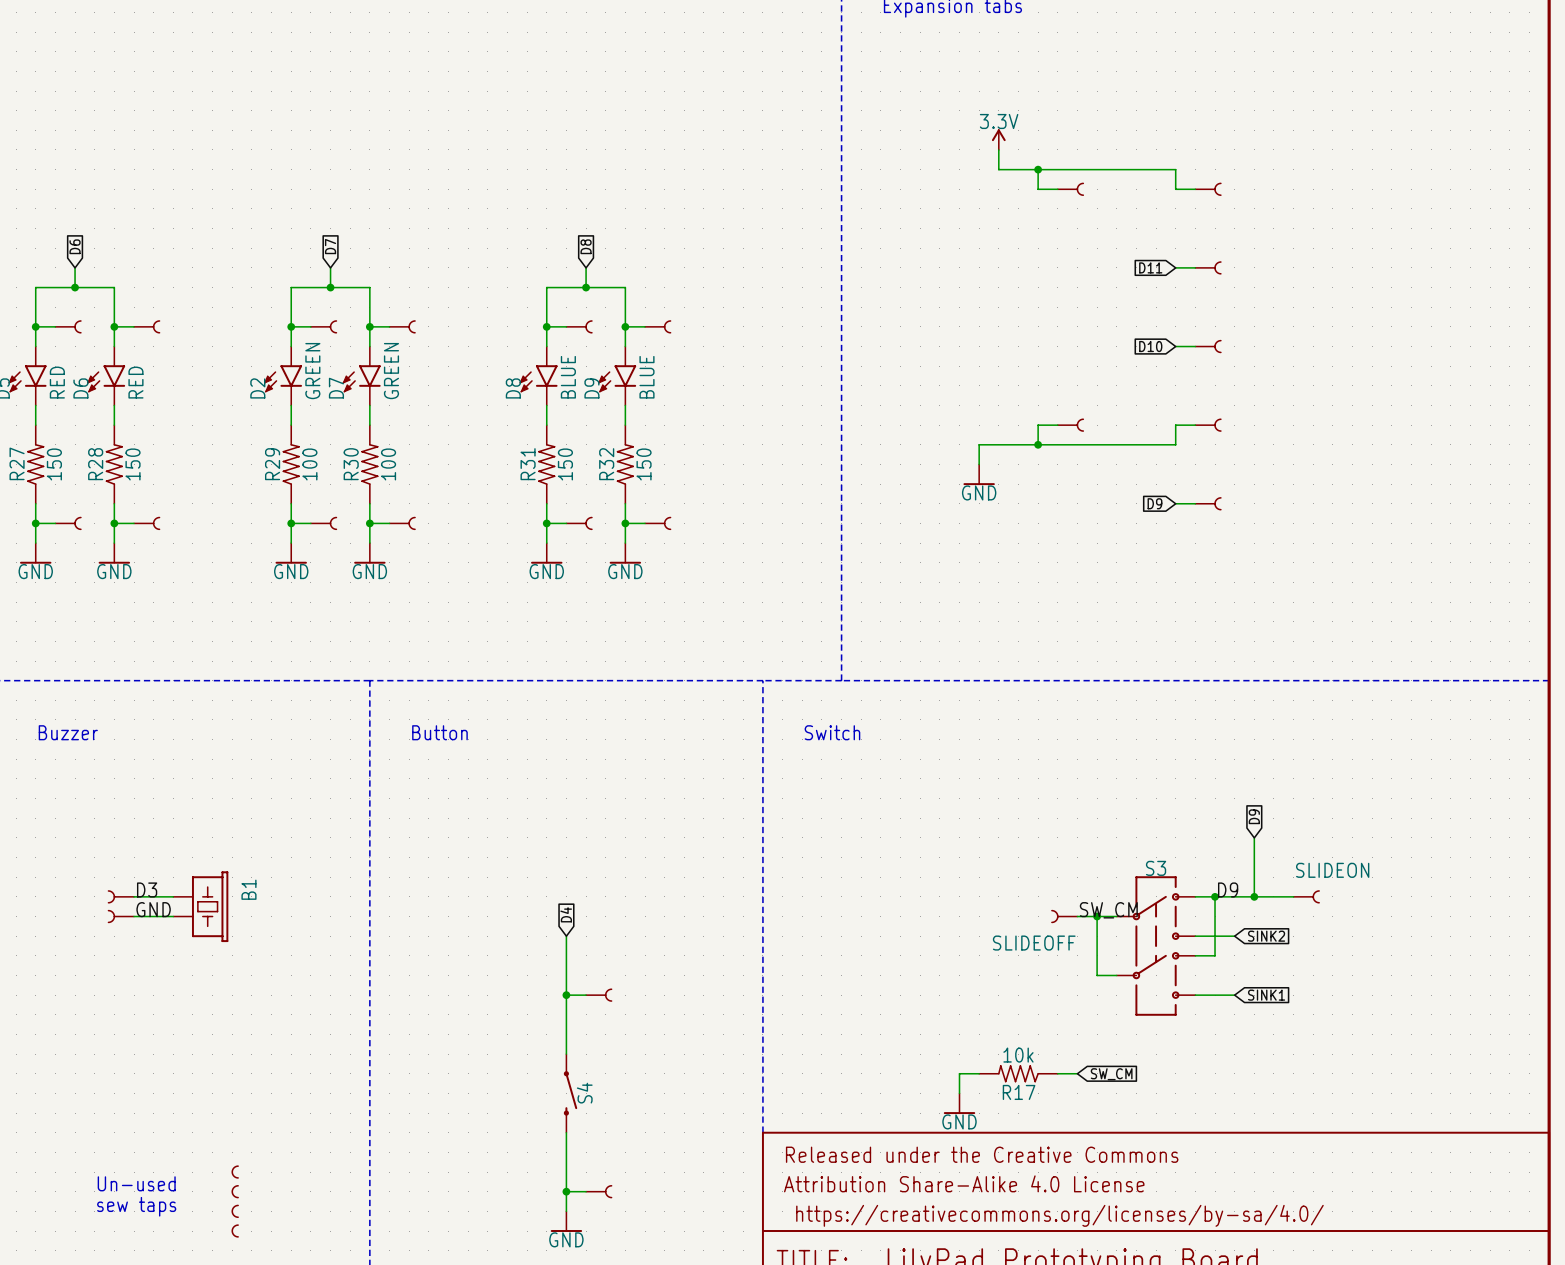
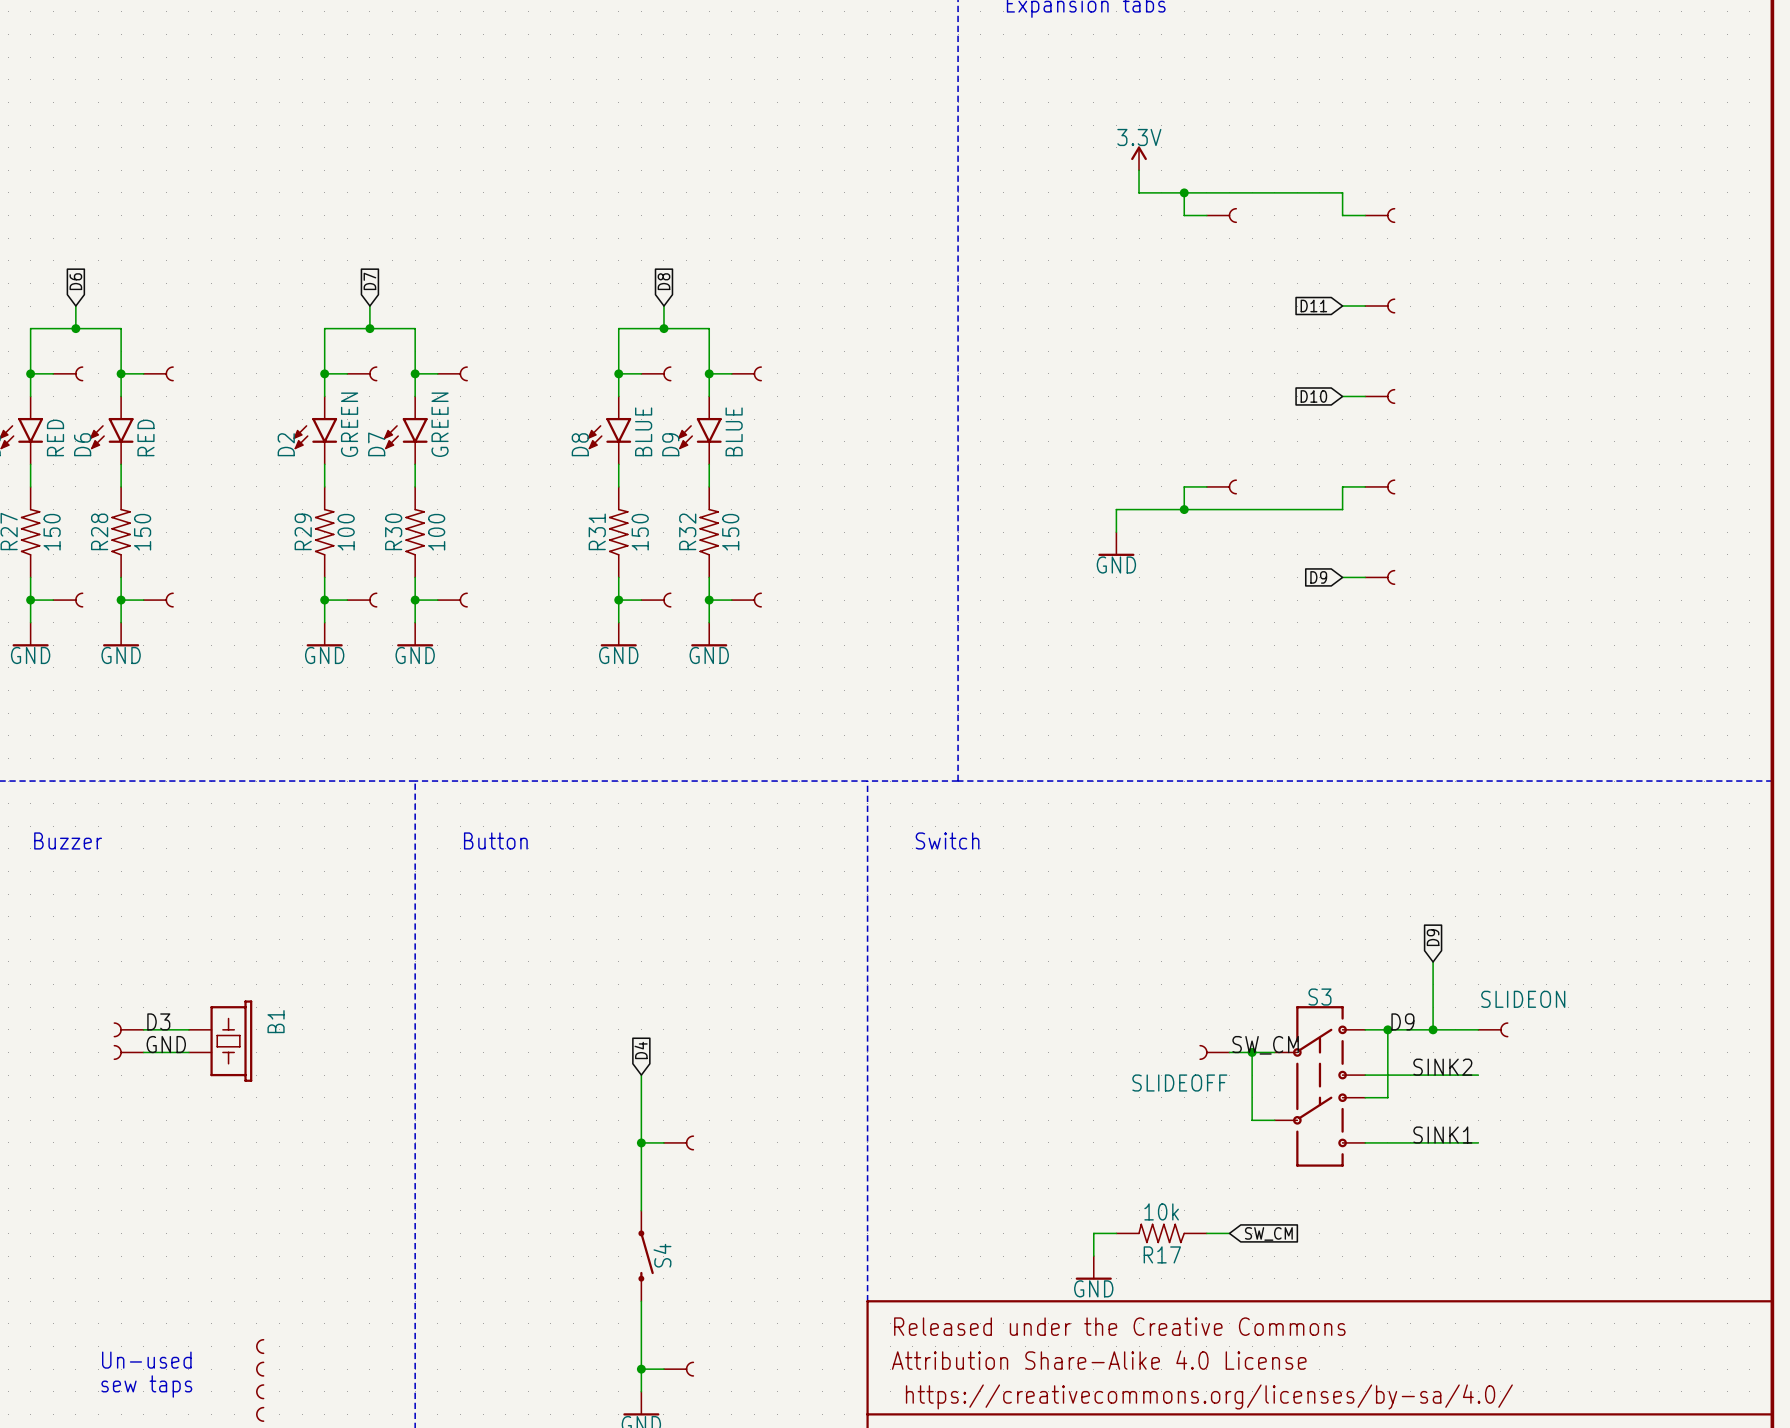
label: none -> SINK2 (1442, 1067)
wire: none -> (1410, 1075) (1478, 1075)
global label: SINK2 (1266, 936) -> none
label: none -> SINK1 (1442, 1135)
wire: none -> (1410, 1142) (1478, 1142)
global label: SINK1 (1266, 995) -> none

